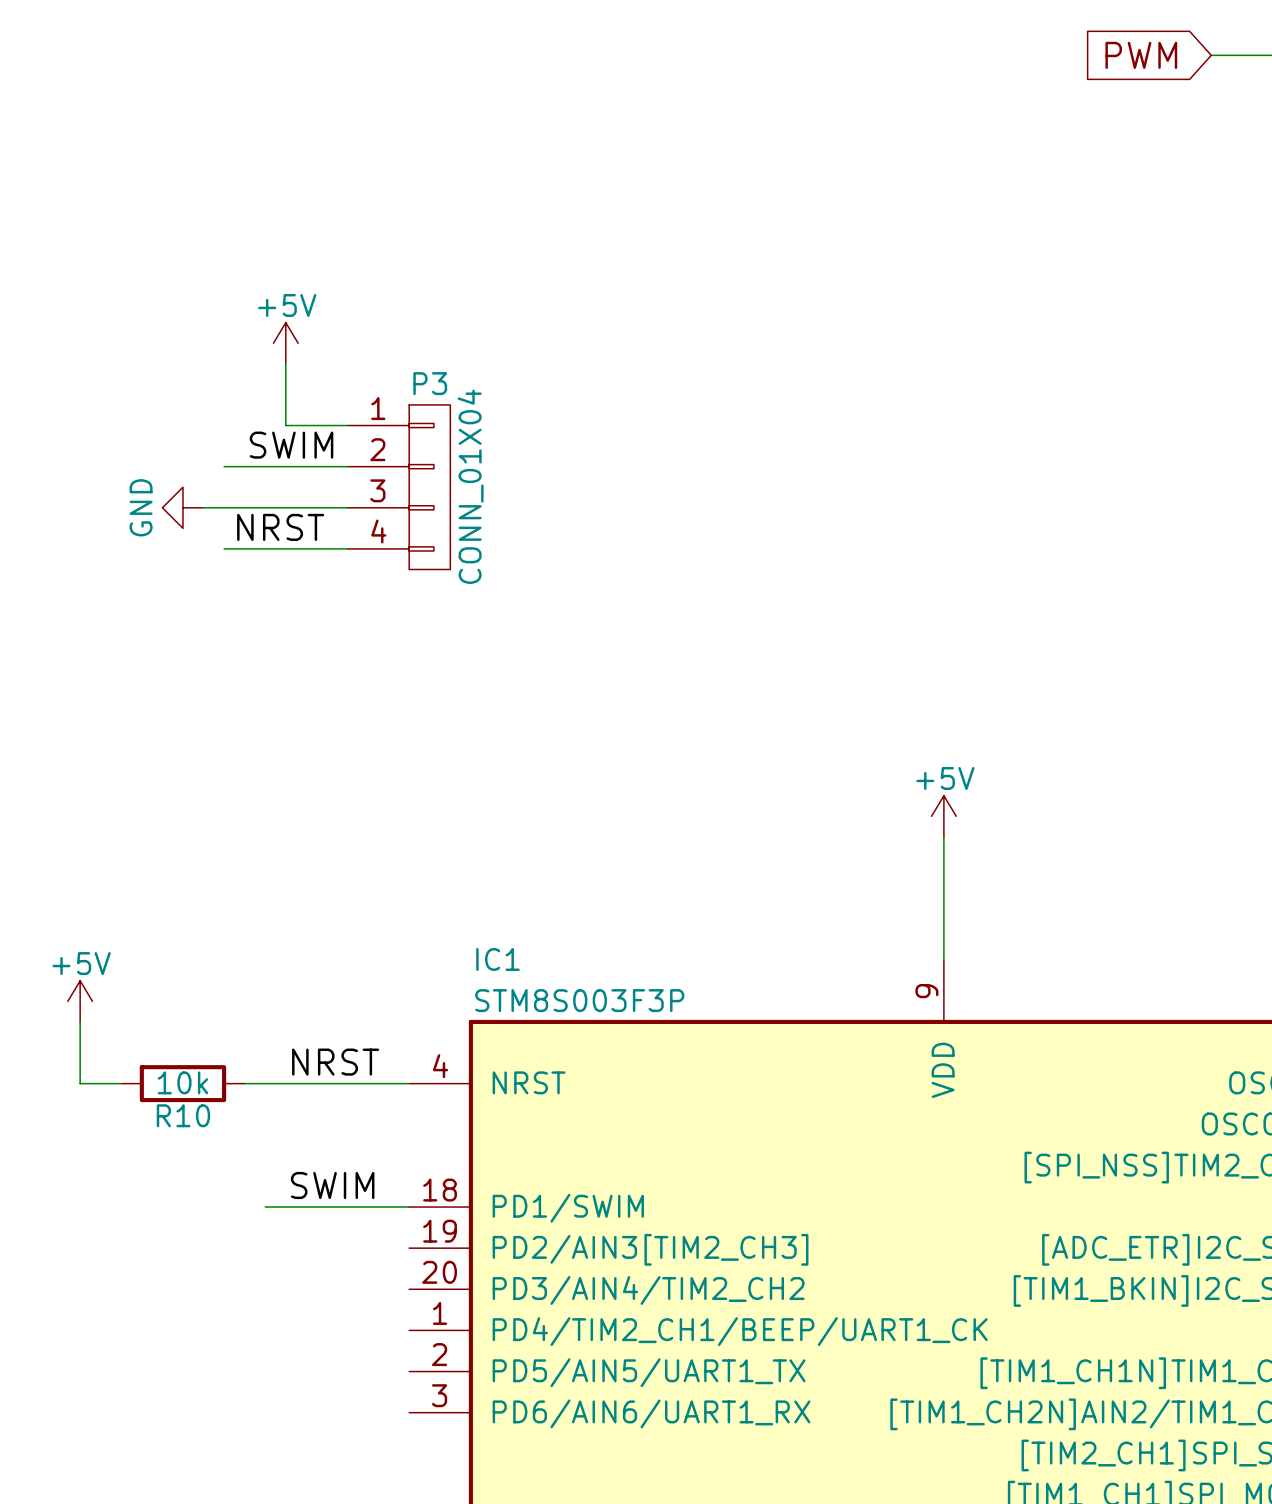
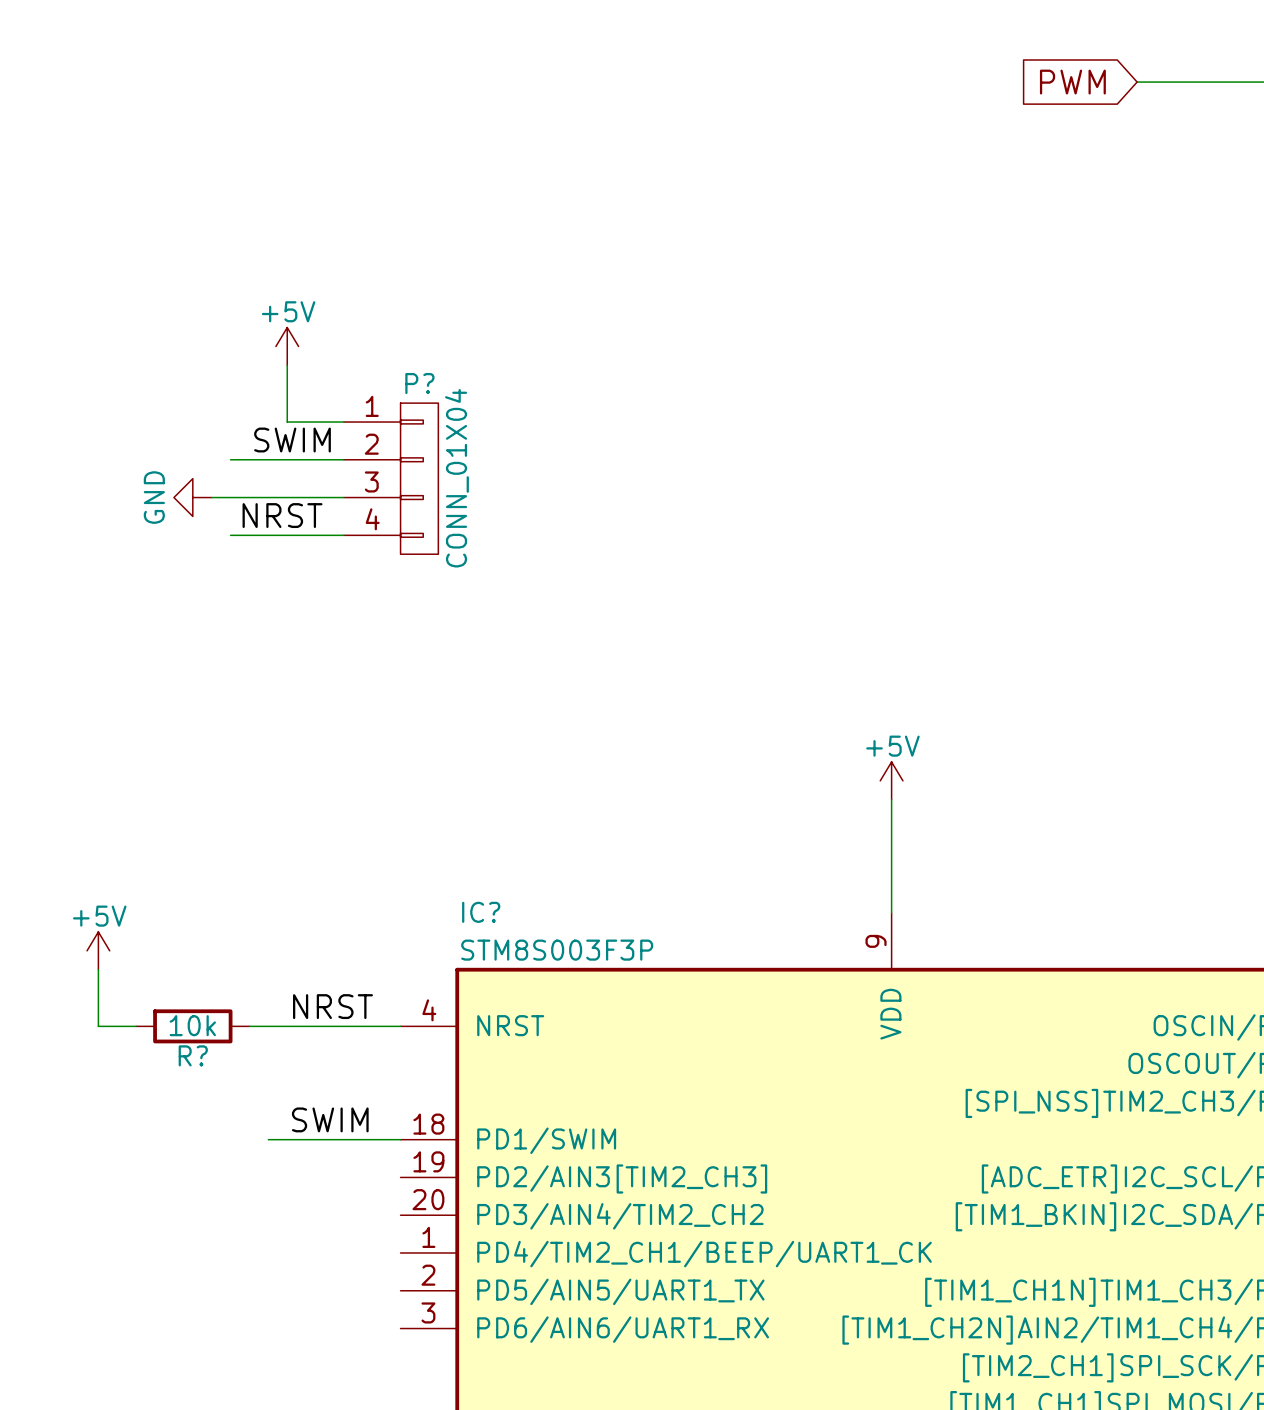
P3 name: P3 (430, 383) -> P? (419, 383)
IC1 name: IC1 (497, 959) -> IC? (481, 912)
R10 name: R10 (183, 1115) -> R? (193, 1055)

